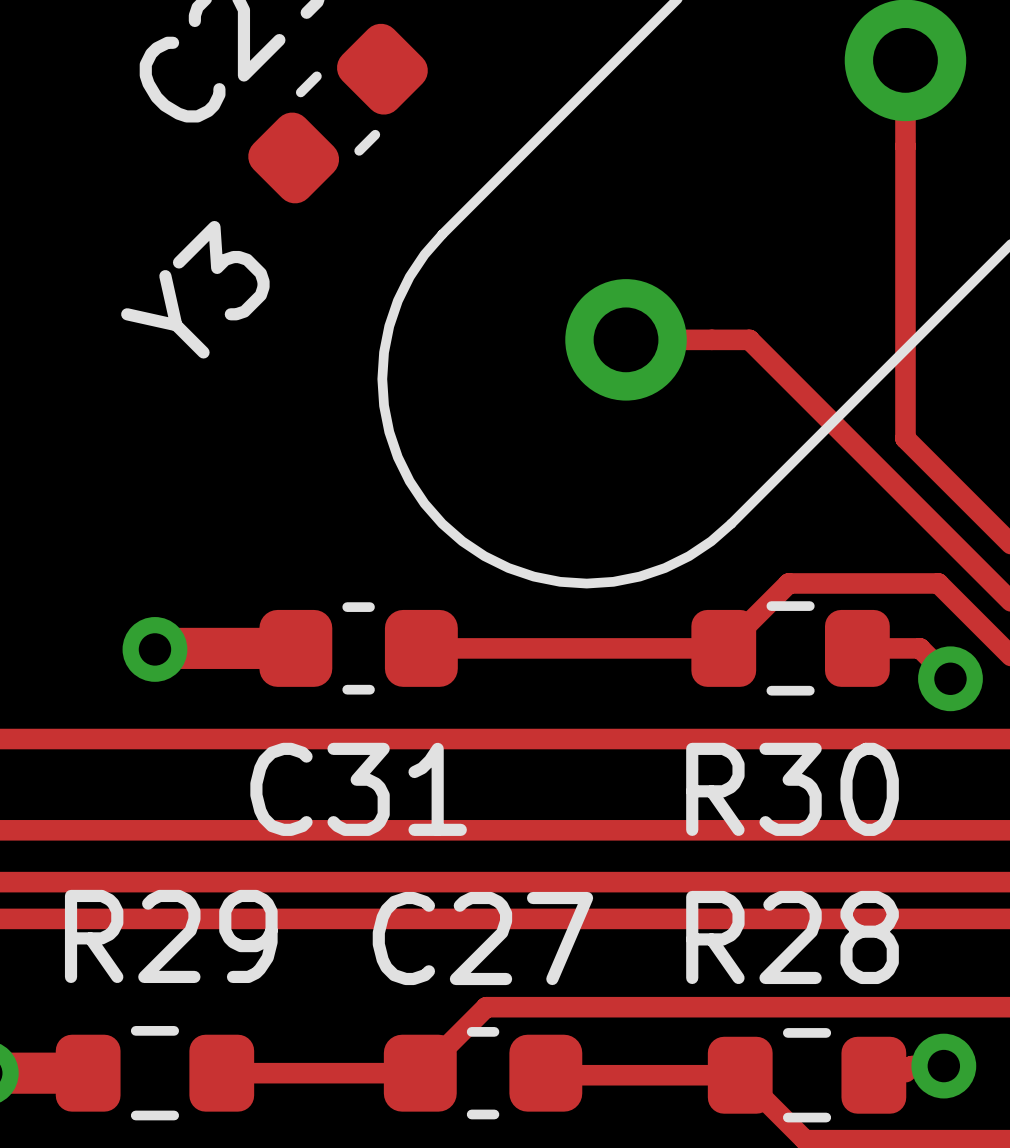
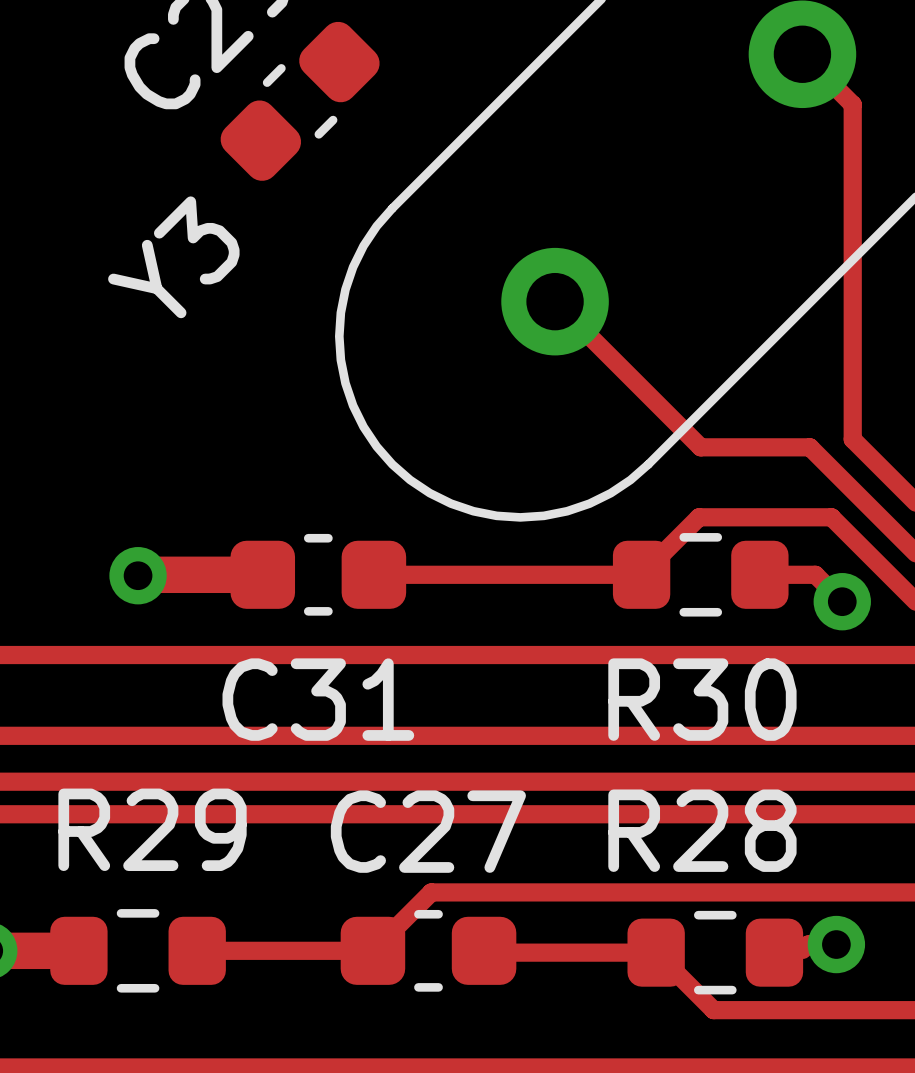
track: (905, 60) (905, 438) (962, 495) -> (802, 54) (852, 104) (852, 439)
track: (626, 339) (749, 339) (914, 504) -> (555, 301) (700, 447) (809, 447)

